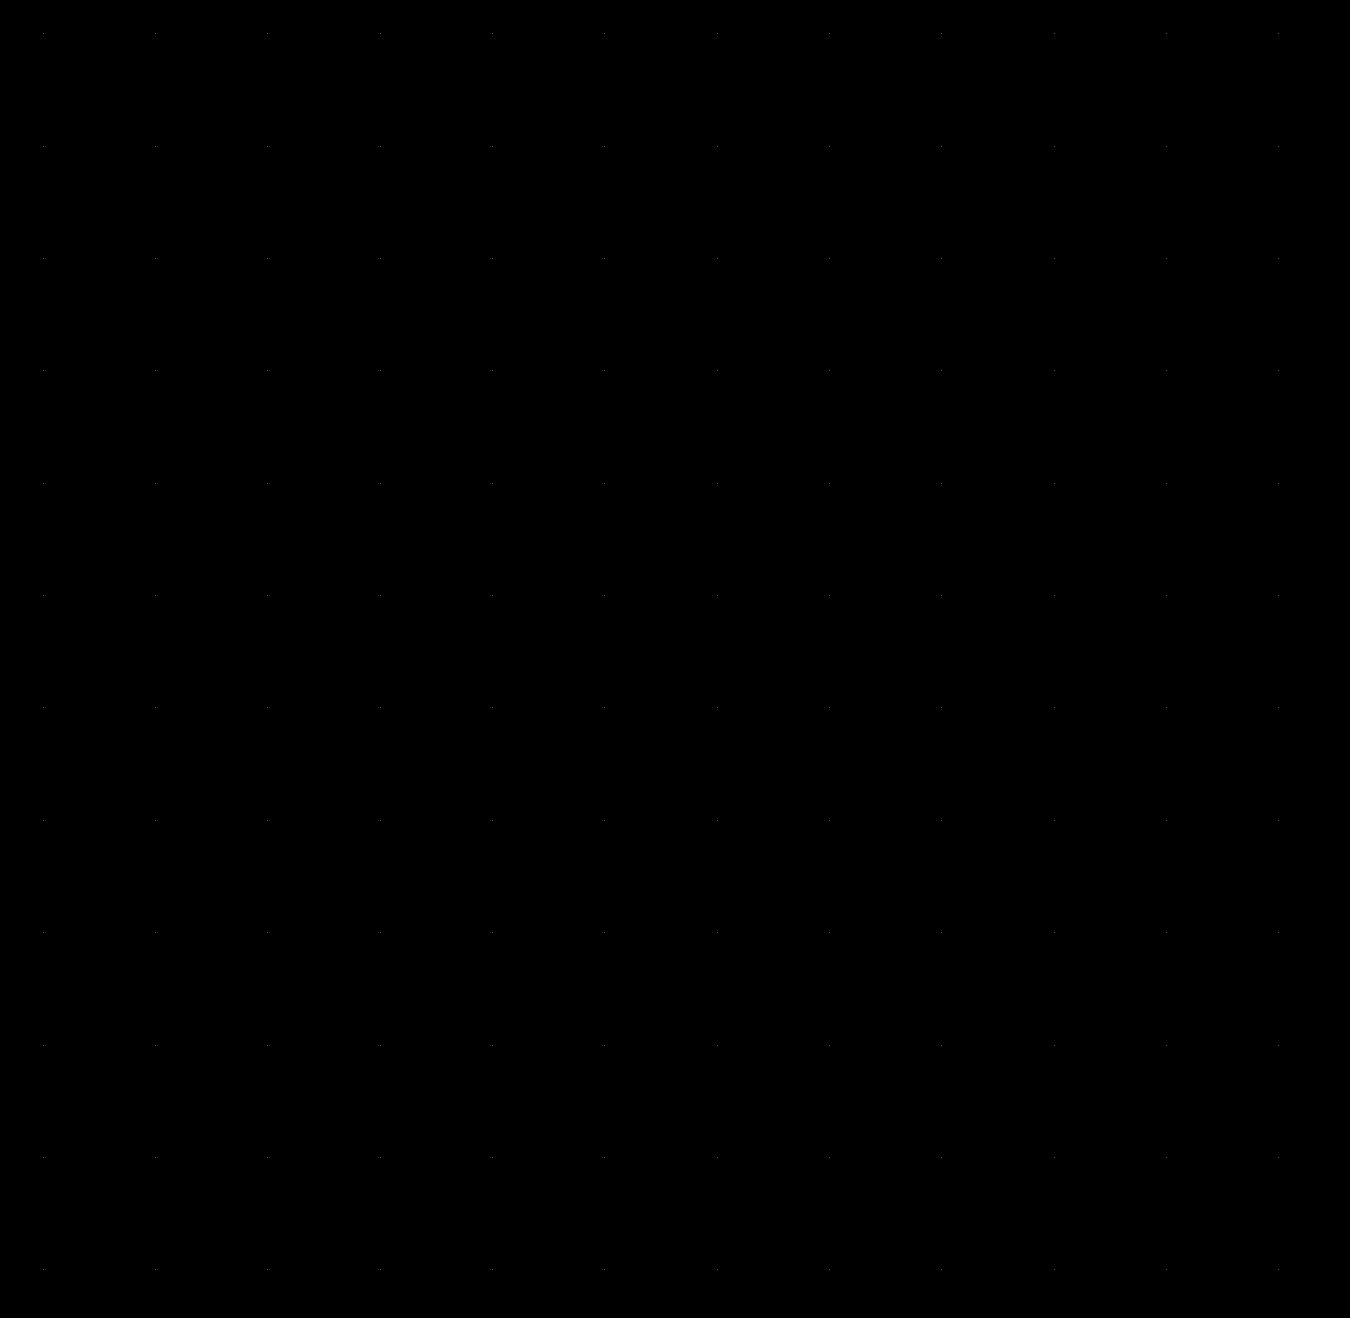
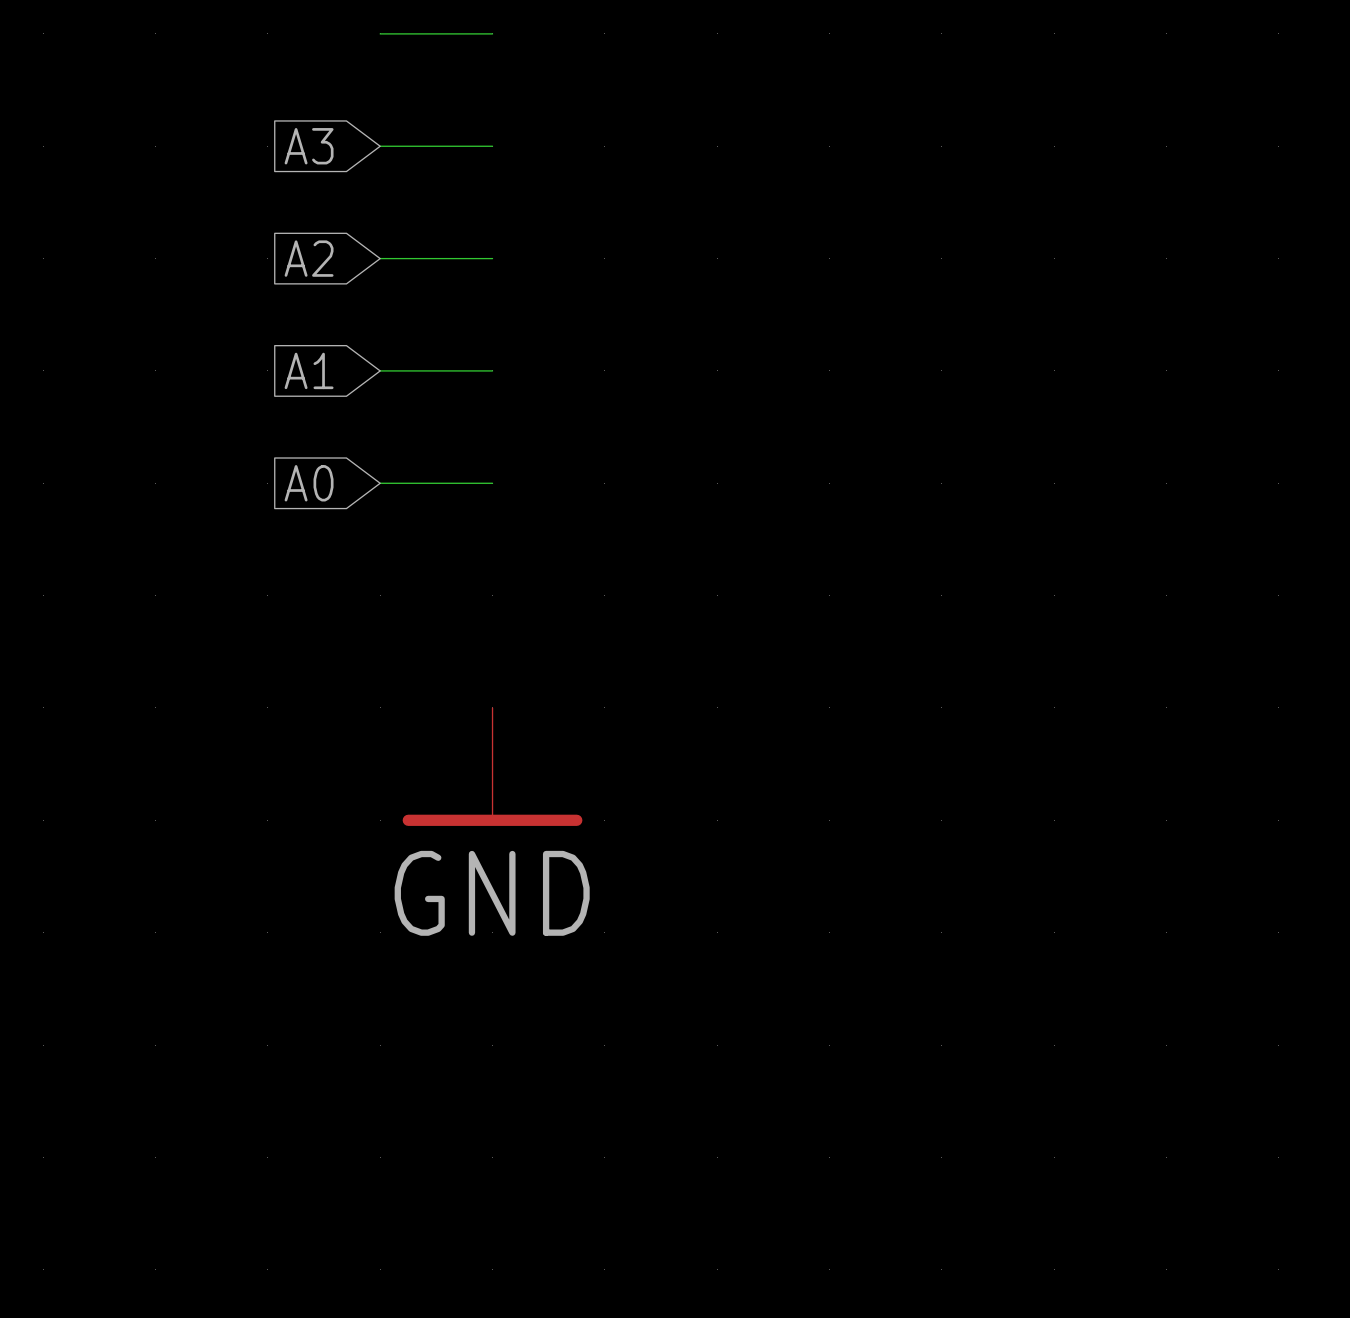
wire: none -> (380, 33) (492, 33)
global label: none -> A3 (309, 146)
wire: none -> (380, 146) (492, 146)
global label: none -> A2 (309, 258)
wire: none -> (380, 258) (492, 258)
global label: none -> A1 (309, 370)
wire: none -> (380, 370) (492, 370)
global label: none -> A0 (309, 483)
wire: none -> (380, 483) (492, 483)
power symbol: none -> GND (492, 766)

